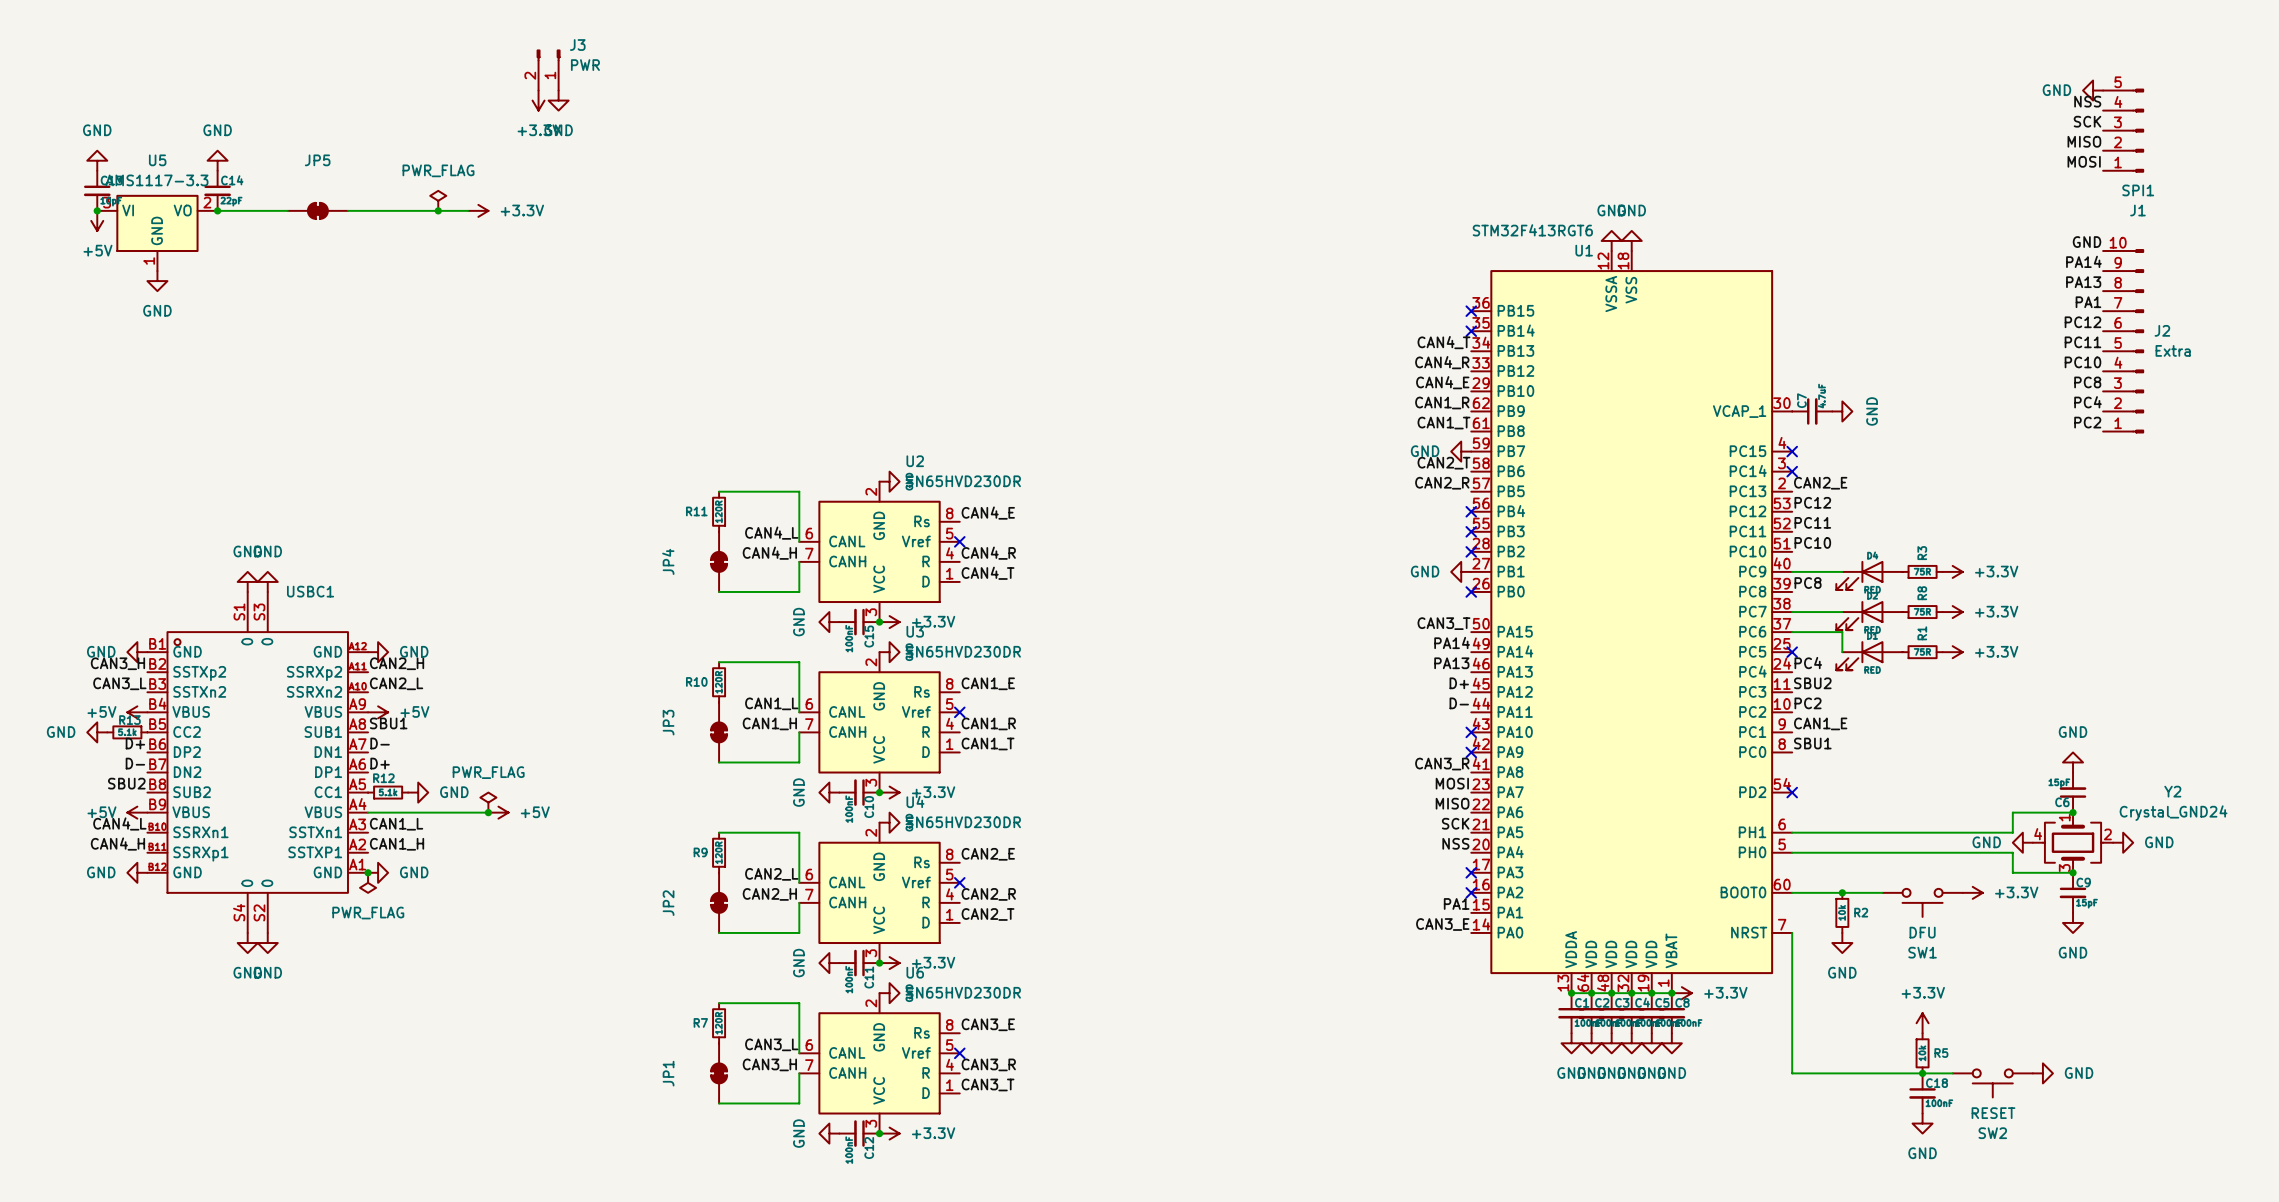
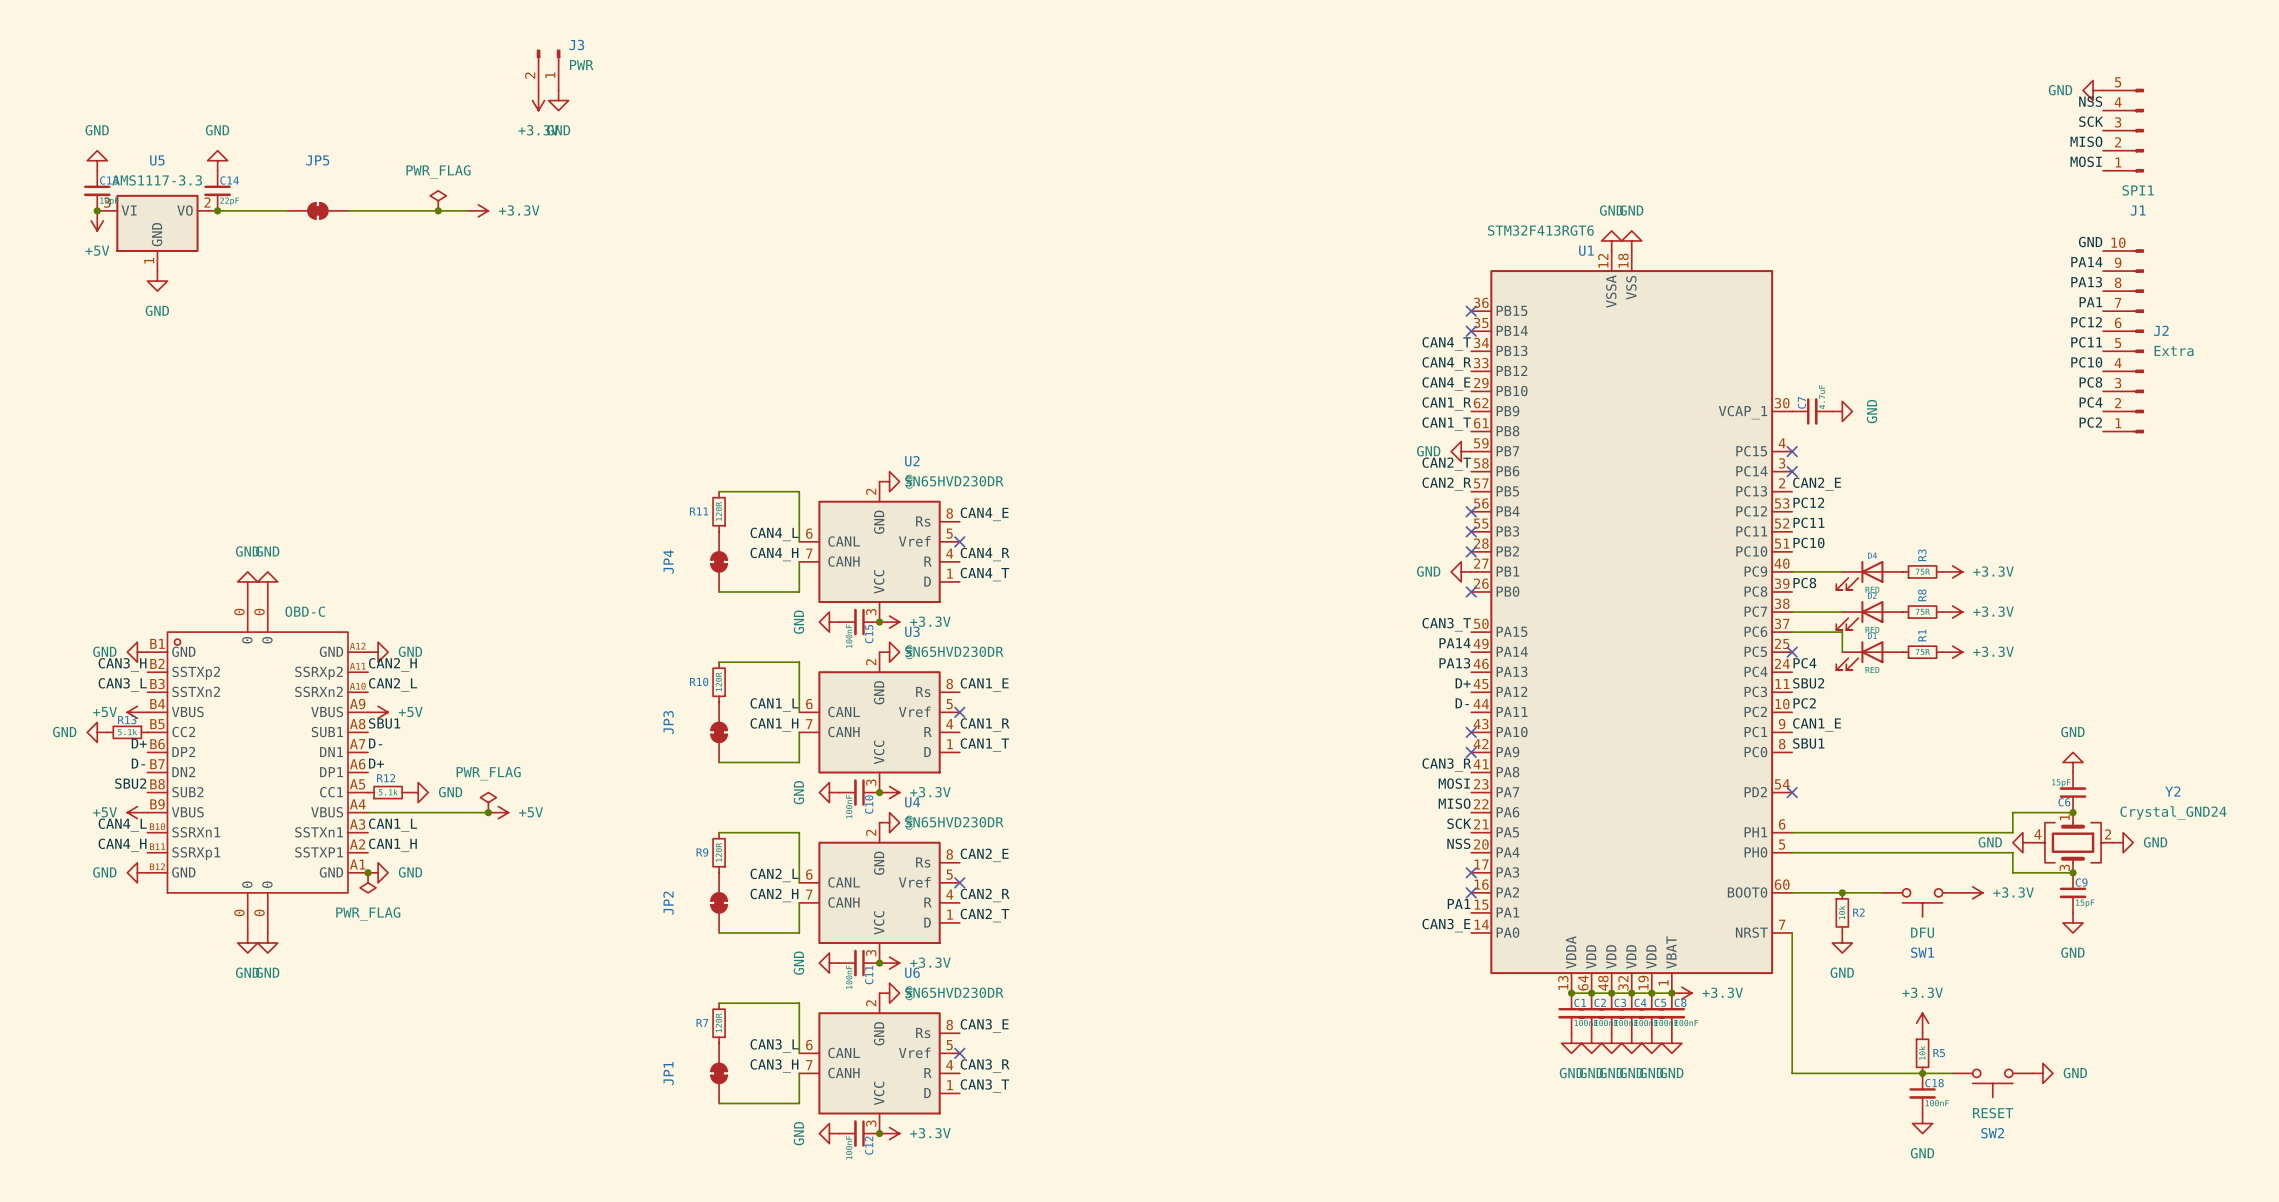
USBC1 name: USBC1 (310, 591) -> none
USBC1 value: none -> OBD-C (305, 611)
USBC1 pin number: S1 (239, 612) -> 0 (239, 612)
USBC1 pin number: S3 (259, 612) -> 0 (259, 612)
USBC1 pin number: S4 (239, 912) -> 0 (239, 912)
USBC1 pin number: S2 (259, 912) -> 0 (259, 912)

